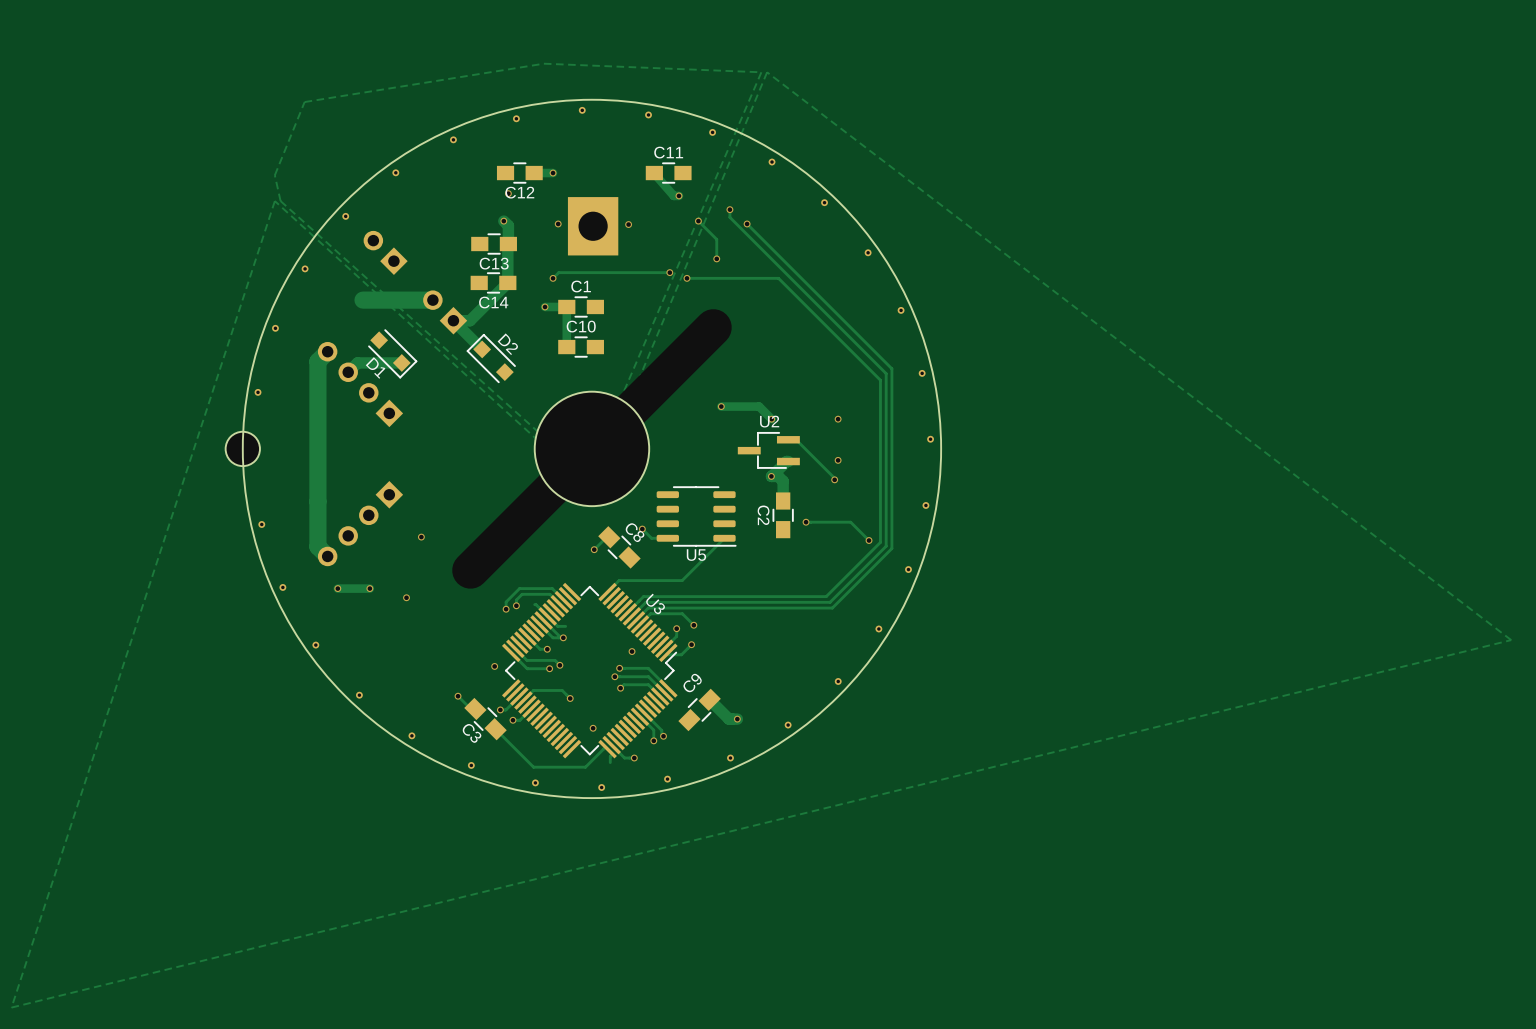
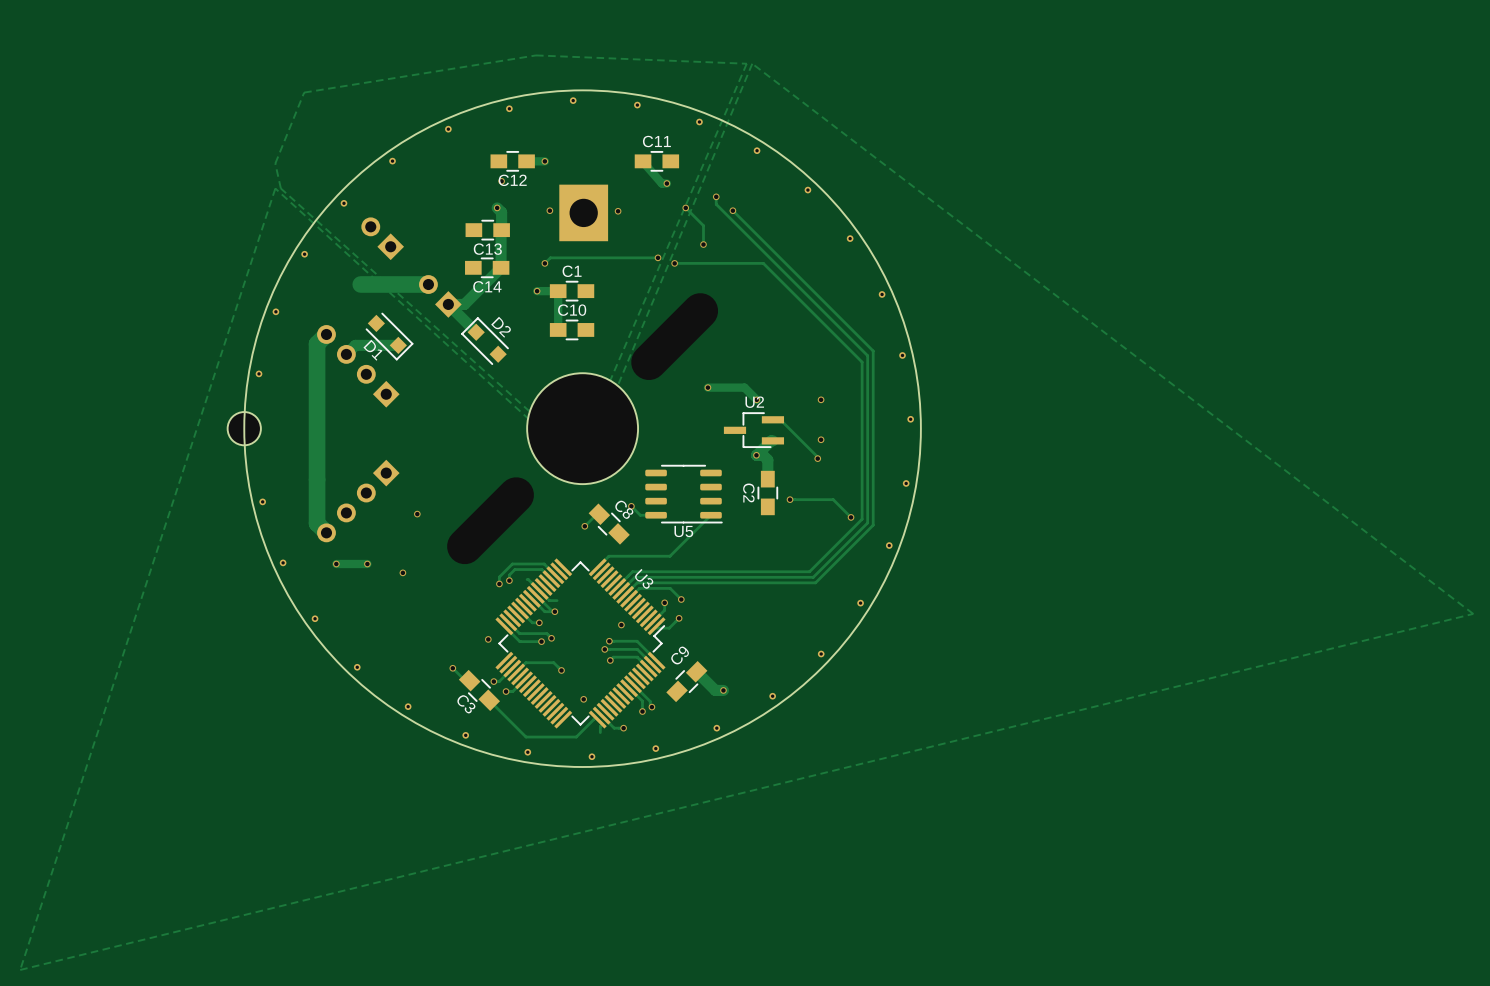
part: none -> (674, 336)
part: (666, 374) -> none
part: (517, 523) -> none
part: none -> (490, 520)

